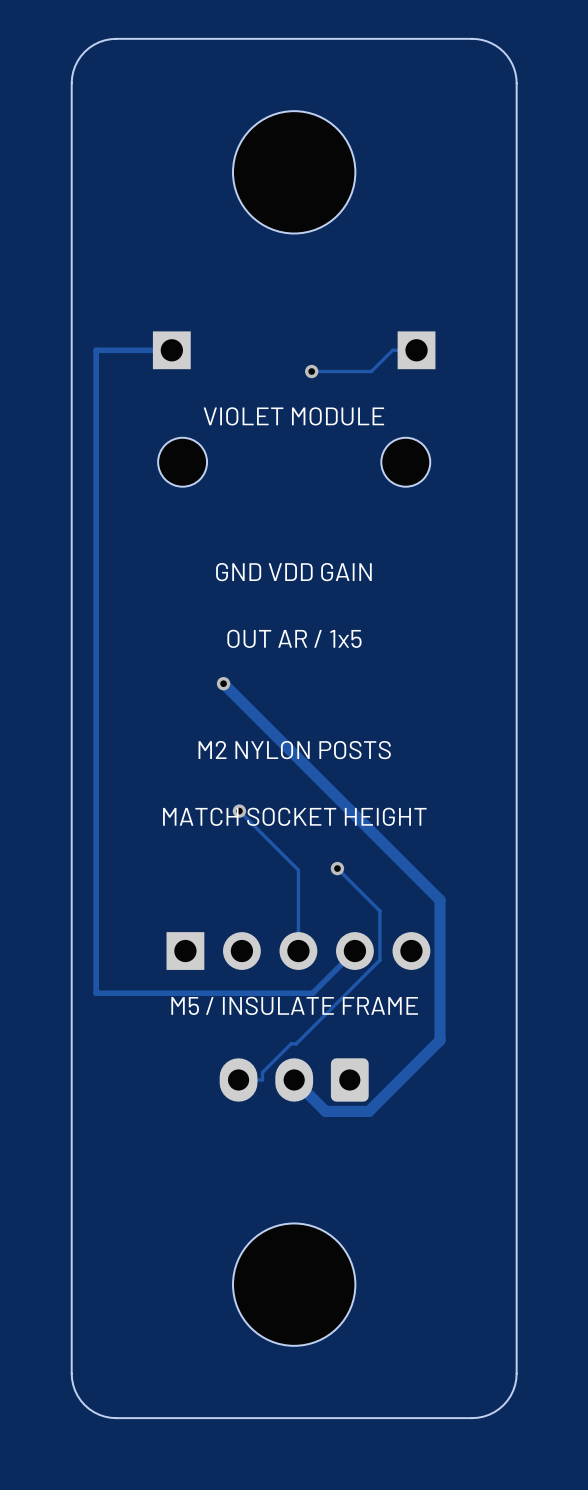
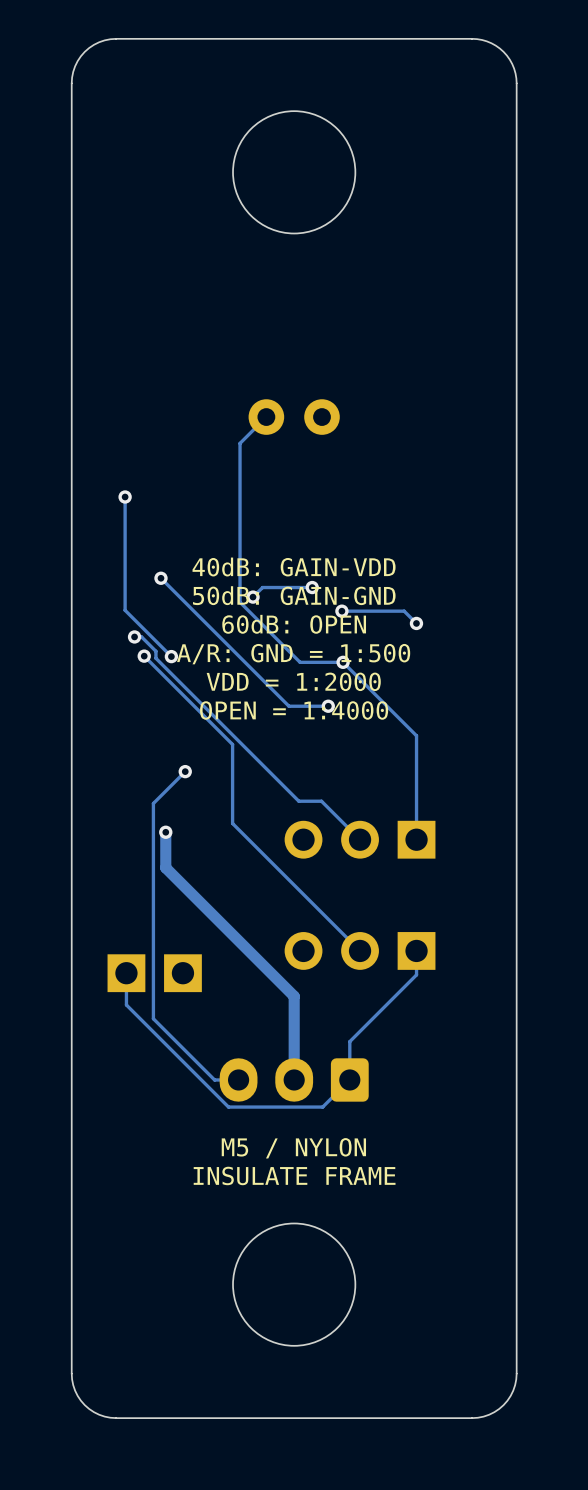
track: (171, 350) (96, 350) (96, 993) (312, 993) (354, 951) -> none
part: (171, 350) -> none
track: (416, 350) (392, 350) (371, 371) (311, 371) -> none
part: (416, 350) -> none
via: (311, 371) -> none
text: VIOLET MODULE (293, 416) -> none
track: none -> (266, 417) (240, 443) (240, 602) (300, 662) (343, 662) (416, 735) (416, 839)
part: none -> (294, 417)
part: (182, 462) -> none
part: (405, 462) -> none
track: none -> (125, 497) (125, 610) (171, 656)
via: none -> (125, 497)
text: GND VDD GAIN (293, 572) -> 40dB: GAIN-VDD (294, 567)
track: none -> (160, 578) (288, 706) (328, 706)
via: none -> (160, 578)
track: none -> (312, 587) (262, 587) (253, 597)
via: none -> (312, 587)
text: none -> 50dB: GAIN-GND (294, 595)
via: none -> (253, 597)
track: none -> (341, 611) (404, 611) (416, 623)
via: none -> (341, 611)
via: none -> (416, 623)
text: none -> 60dB: OPEN (294, 624)
track: none -> (134, 636) (141, 636) (155, 651) (155, 658) (298, 801) (321, 801) (360, 839)
via: none -> (134, 636)
text: OUT AR / 1x5 (294, 638) -> none
text: none -> A/R: GND = 1:500 (293, 654)
track: none -> (144, 656) (232, 744) (232, 823) (360, 950)
via: none -> (144, 656)
via: none -> (171, 656)
via: none -> (343, 662)
text: none -> VDD = 1:2000 (293, 681)
track: (223, 683) (440, 900) (440, 1040) (368, 1111) (325, 1111) (294, 1079) -> (165, 832) (165, 867) (294, 996) (294, 1079)
via: (223, 683) -> none
via: none -> (328, 706)
text: none -> OPEN = 1:4000 (294, 710)
text: M2 NYLON POSTS (294, 750) -> none
via: none -> (185, 771)
track: (239, 811) (298, 870) (298, 951) -> none
via: (239, 811) -> none
text: MATCH SOCKET HEIGHT (294, 816) -> none
via: none -> (165, 832)
part: none -> (360, 839)
track: (337, 868) (379, 911) (379, 960) (296, 1043) (291, 1043) (262, 1072) (262, 1079) (238, 1079) -> (185, 771) (153, 803) (153, 1018) (214, 1079) (238, 1079)
via: (337, 868) -> none
part: none -> (360, 950)
track: none -> (416, 950) (416, 974) (349, 1041) (349, 1079) (322, 1107) (228, 1107) (126, 1004) (126, 973)
part: (298, 951) -> none
part: none -> (126, 973)
part: none -> (182, 973)
text: M5 / INSULATE FRAME (294, 1005) -> none
text: none -> M5 / NYLON (293, 1148)
text: none -> INSULATE FRAME (294, 1175)

